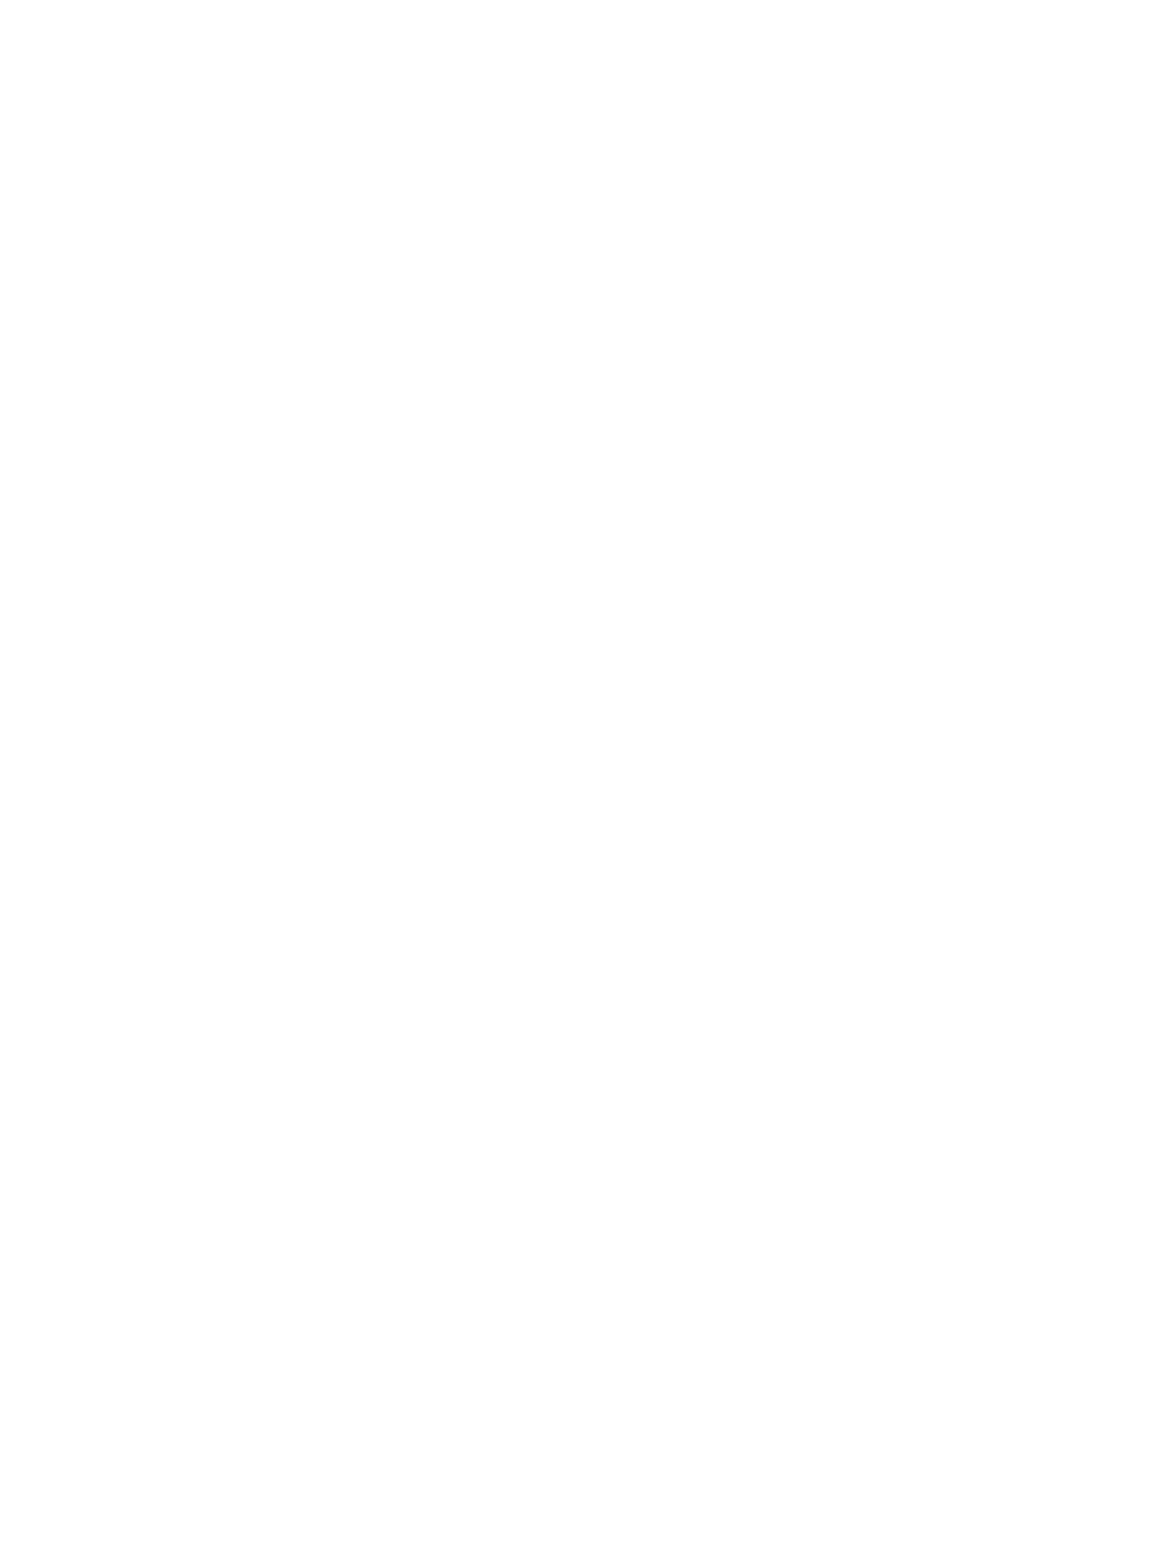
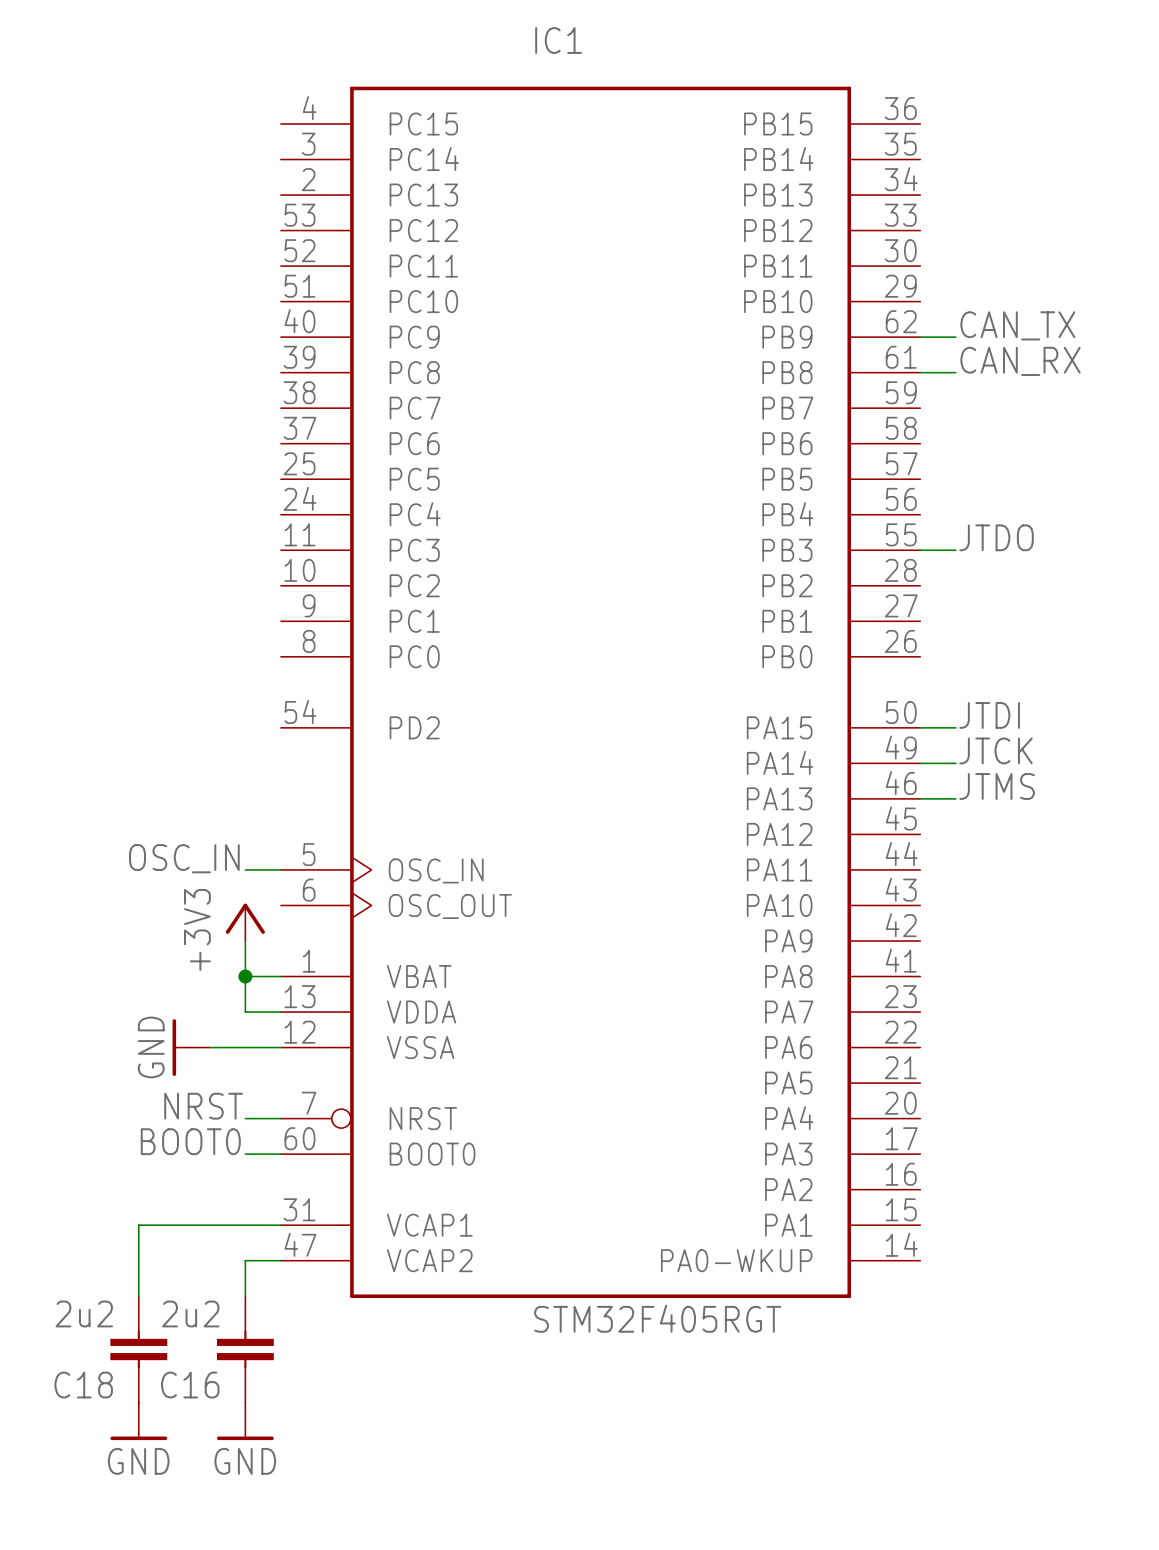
label: none -> CAN_TX (1017, 325)
wire: none -> (920, 337) (955, 337)
label: none -> CAN_RX (1020, 361)
wire: none -> (920, 372) (955, 372)
label: none -> JTDO (996, 537)
wire: none -> (920, 550) (955, 550)
IC1: none -> STM32F405RGT (600, 692)
label: none -> JTDI (989, 715)
wire: none -> (920, 727) (955, 727)
label: none -> JTCK (996, 750)
wire: none -> (920, 763) (955, 763)
label: none -> JTMS (997, 786)
wire: none -> (920, 798) (955, 798)
label: none -> OSC_IN (184, 858)
wire: none -> (245, 869) (280, 869)
power symbol: none -> +3V3 (245, 922)
wire: none -> (245, 940) (245, 1012) (280, 1012)
wire: none -> (245, 976) (280, 976)
junction: none -> (245, 976)
power symbol: none -> GND (191, 1047)
wire: none -> (209, 1047) (280, 1047)
label: none -> NRST (203, 1106)
wire: none -> (245, 1118) (280, 1118)
label: none -> BOOT0 (190, 1141)
wire: none -> (245, 1154) (280, 1154)
wire: none -> (280, 1225) (138, 1225) (138, 1296)
wire: none -> (280, 1260) (245, 1260) (245, 1296)
C18: none -> 2u2 (138, 1349)
C16: none -> 2u2 (245, 1349)
power symbol: none -> GND (138, 1421)
power symbol: none -> GND (245, 1421)

